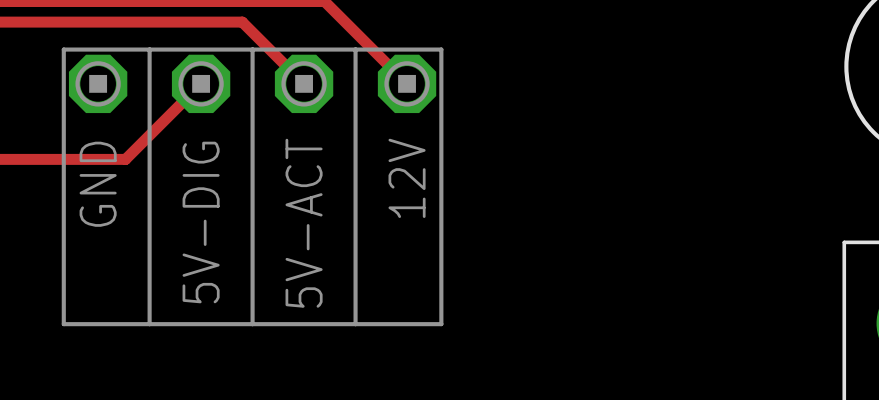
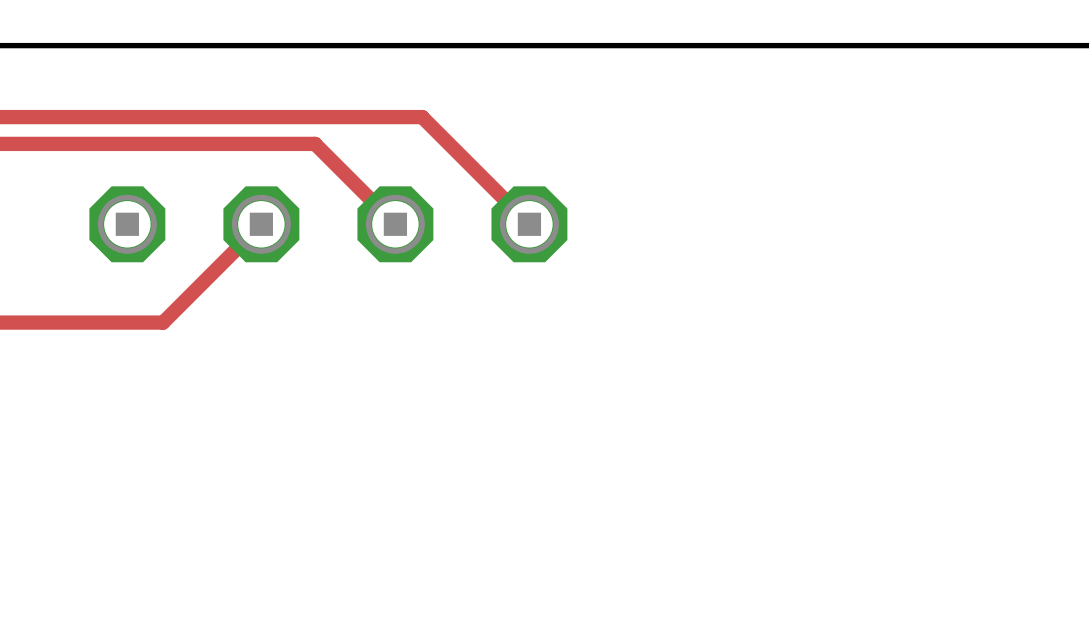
line: (63, 49) (441, 49) (441, 324) (63, 324) (63, 49) -> none
line: (149, 49) (149, 324) -> none
line: (252, 49) (252, 324) -> none
line: (355, 49) (355, 324) -> none
text: 12V (407, 178) -> none
text: GND (98, 184) -> none
text: 5V-DIG (201, 222) -> none
text: 5V-ACT (304, 223) -> none

